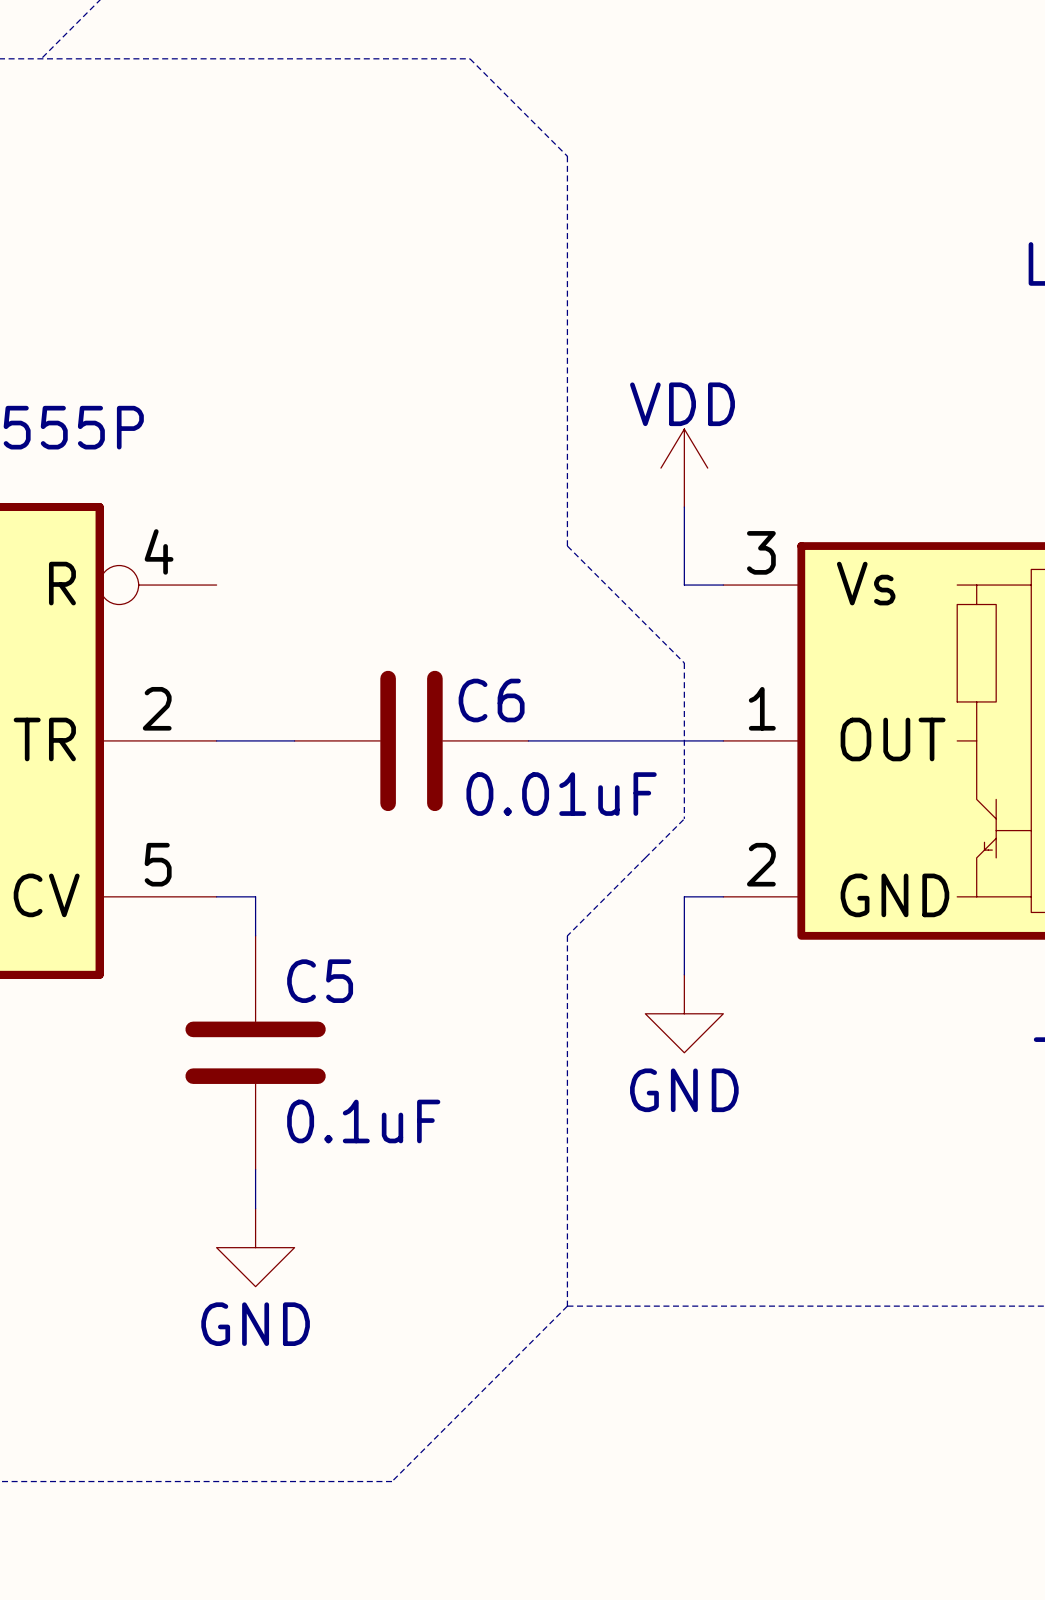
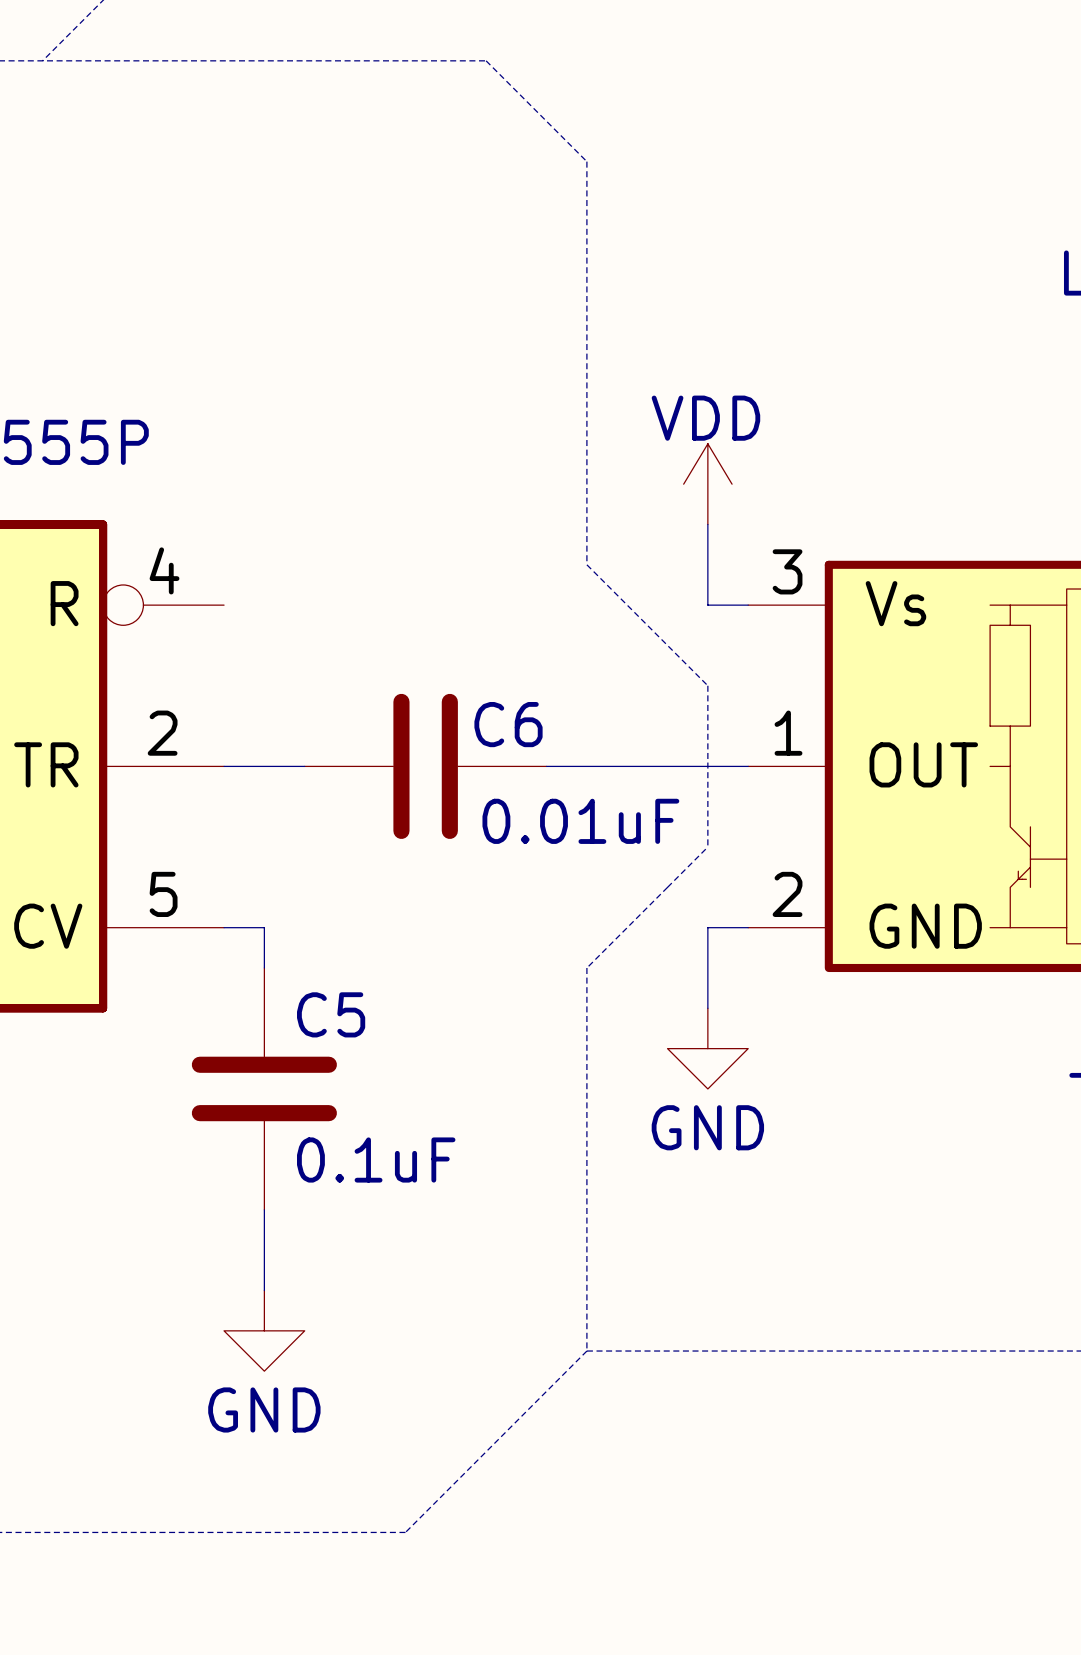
power symbol position: GND (255, 1247) -> GND (264, 1330)

